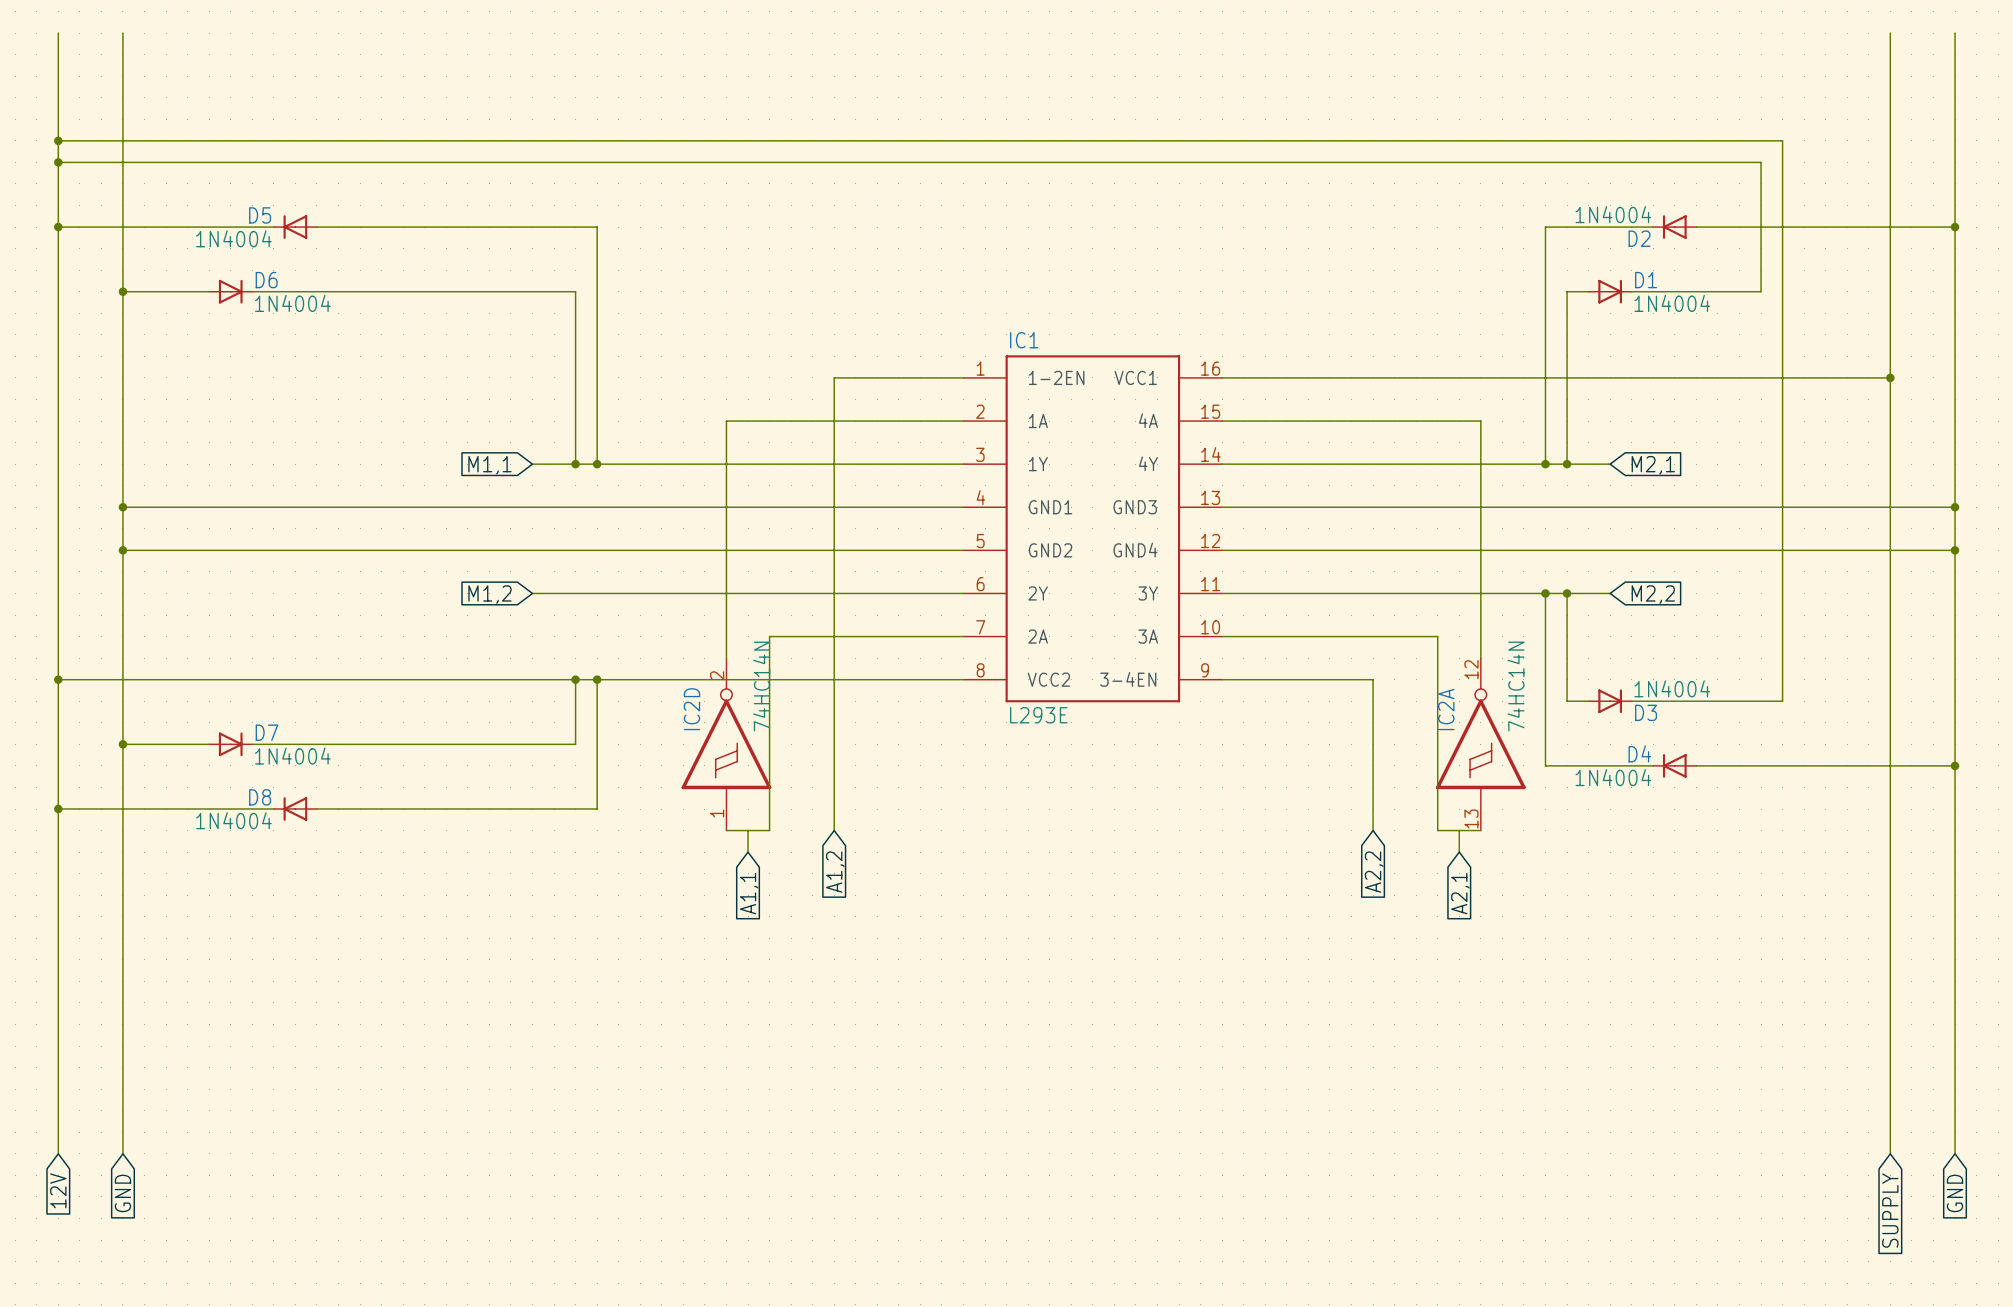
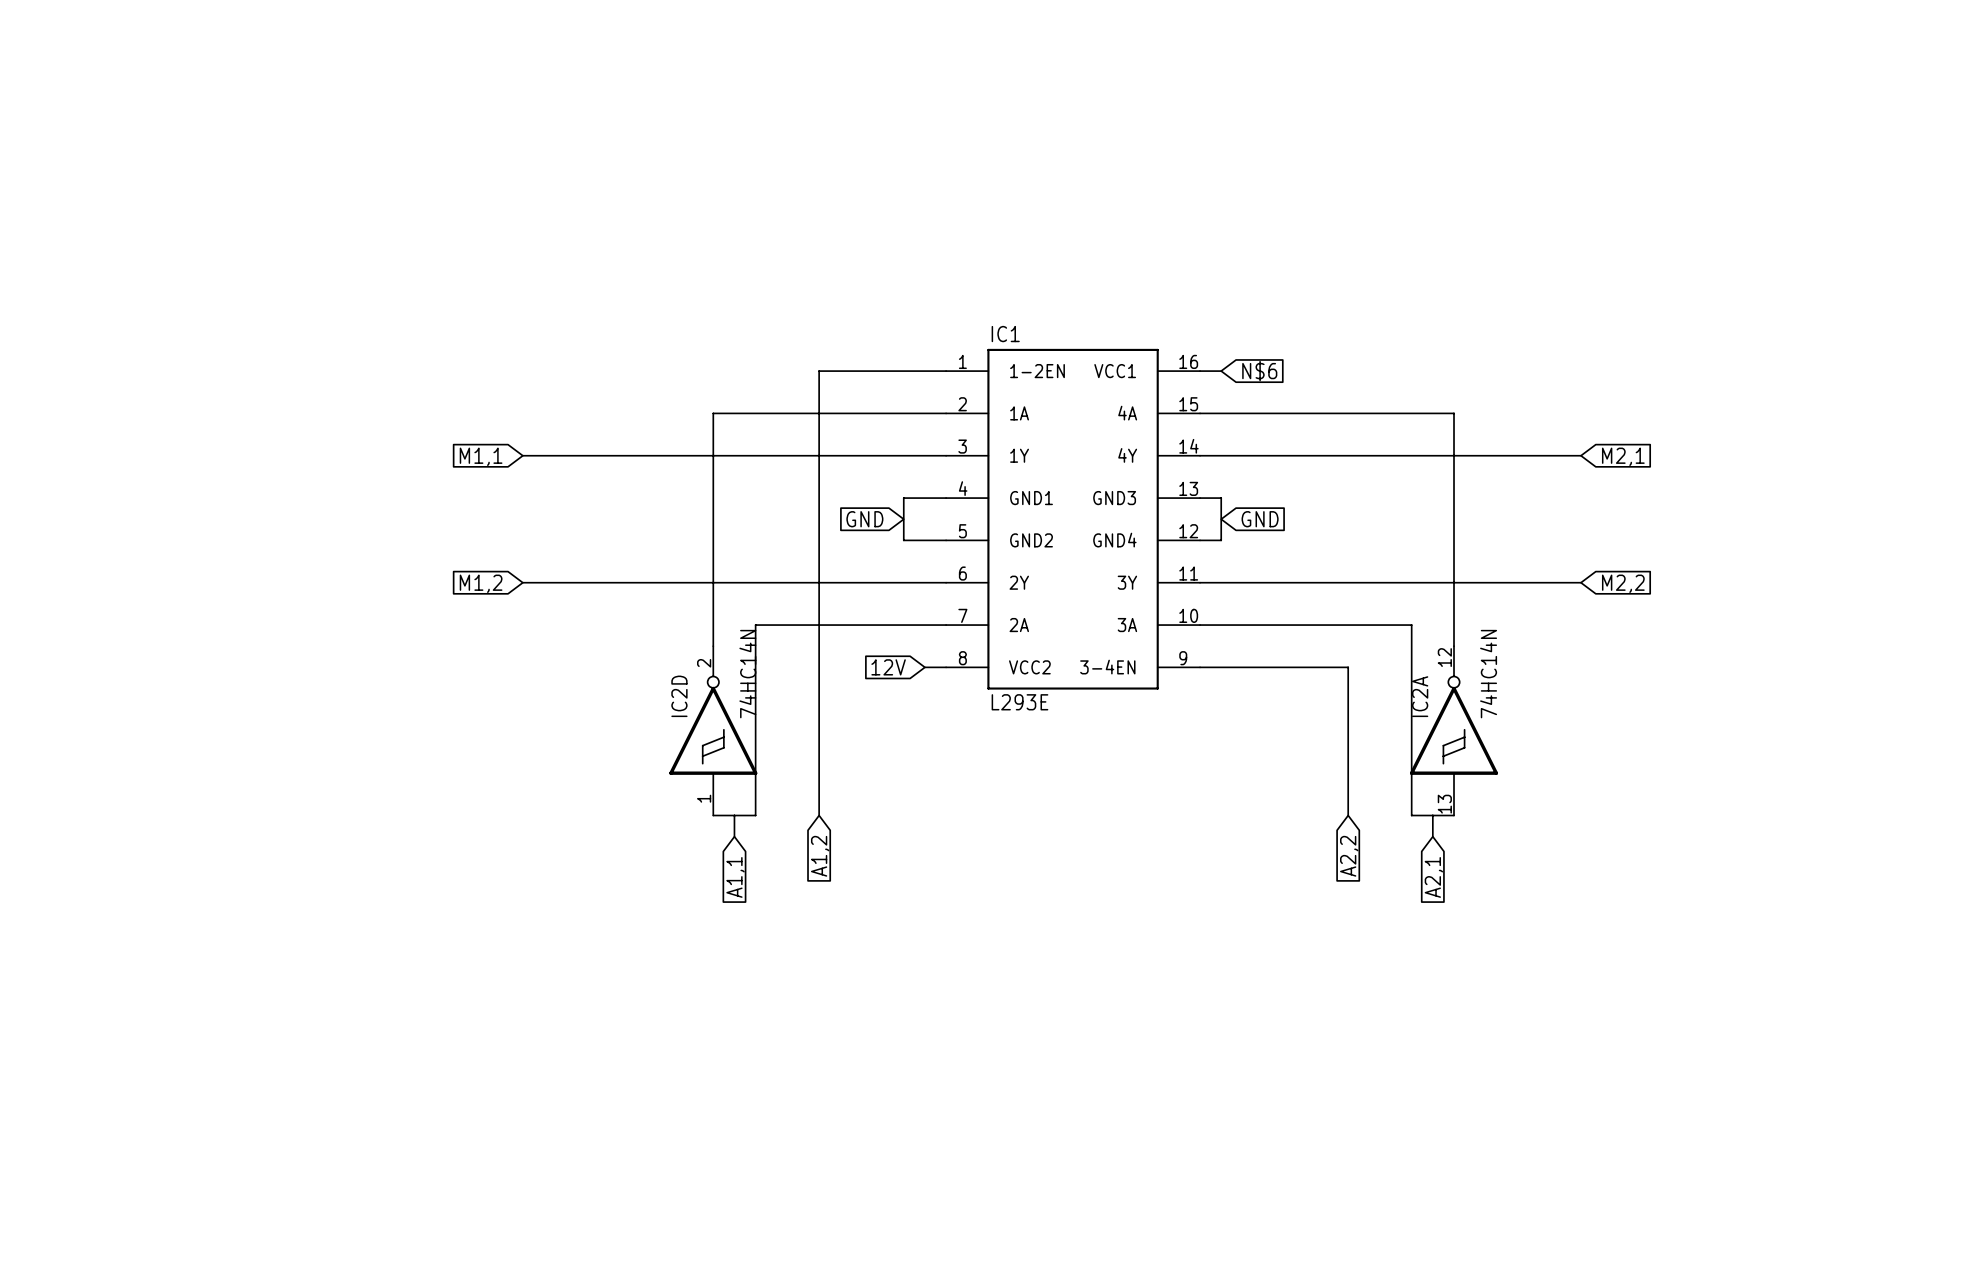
wire: (58, 33) (58, 1153) -> none
wire: (122, 33) (122, 1153) -> none
wire: (1890, 33) (1890, 1153) -> none
wire: (1955, 33) (1955, 1153) -> none
wire: (58, 140) (1782, 140) (1782, 701) (1631, 701) -> none
junction: (58, 140) -> none
wire: (58, 162) (1761, 162) (1761, 291) (1631, 291) -> none
junction: (58, 162) -> none
wire: (58, 227) (273, 227) -> none
junction: (58, 227) -> none
D5: 1N4004 (295, 227) -> none
wire: (316, 227) (597, 227) (597, 464) -> none
wire: (1653, 227) (1545, 227) (1545, 464) -> none
D2: 1N4004 (1674, 227) -> none
wire: (1696, 227) (1955, 227) -> none
junction: (1955, 227) -> none
wire: (122, 291) (209, 291) -> none
junction: (122, 291) -> none
D6: 1N4004 (230, 291) -> none
wire: (252, 291) (575, 291) (575, 464) -> none
wire: (1588, 291) (1567, 291) (1567, 464) -> none
D1: 1N4004 (1610, 291) -> none
wire: (1243, 377) (1890, 377) -> none
global label: none -> N$6 (1259, 371)
junction: (1890, 377) -> none
junction: (575, 464) -> none
junction: (597, 464) -> none
junction: (1545, 464) -> none
junction: (1567, 464) -> none
wire: (122, 507) (920, 507) -> (903, 540) (903, 498)
junction: (122, 507) -> none
wire: (1243, 507) (1955, 507) -> (1221, 498) (1221, 540)
junction: (1955, 507) -> none
global label: none -> GND (864, 519)
global label: none -> GND (1260, 519)
wire: (122, 550) (920, 550) -> none
junction: (122, 550) -> none
wire: (1243, 550) (1955, 550) -> none
junction: (1955, 550) -> none
wire: (1545, 593) (1545, 765) (1653, 765) -> none
junction: (1545, 593) -> none
wire: (1567, 593) (1567, 701) (1588, 701) -> none
junction: (1567, 593) -> none
wire: (58, 679) (941, 679) -> none
junction: (58, 679) -> none
wire: (575, 679) (575, 744) (252, 744) -> none
junction: (575, 679) -> none
wire: (597, 679) (597, 809) (316, 809) -> none
junction: (597, 679) -> none
global label: none -> 12V (888, 667)
D3: 1N4004 (1610, 701) -> none
wire: (122, 744) (209, 744) -> none
junction: (122, 744) -> none
D7: 1N4004 (230, 744) -> none
D4: 1N4004 (1674, 765) -> none
wire: (1696, 765) (1955, 765) -> none
junction: (1955, 765) -> none
wire: (58, 809) (273, 809) -> none
junction: (58, 809) -> none
D8: 1N4004 (295, 809) -> none
global label: 12V (58, 1190) -> none
global label: GND (122, 1193) -> none
global label: GND (1955, 1193) -> none
global label: SUPPLY (1890, 1210) -> none

